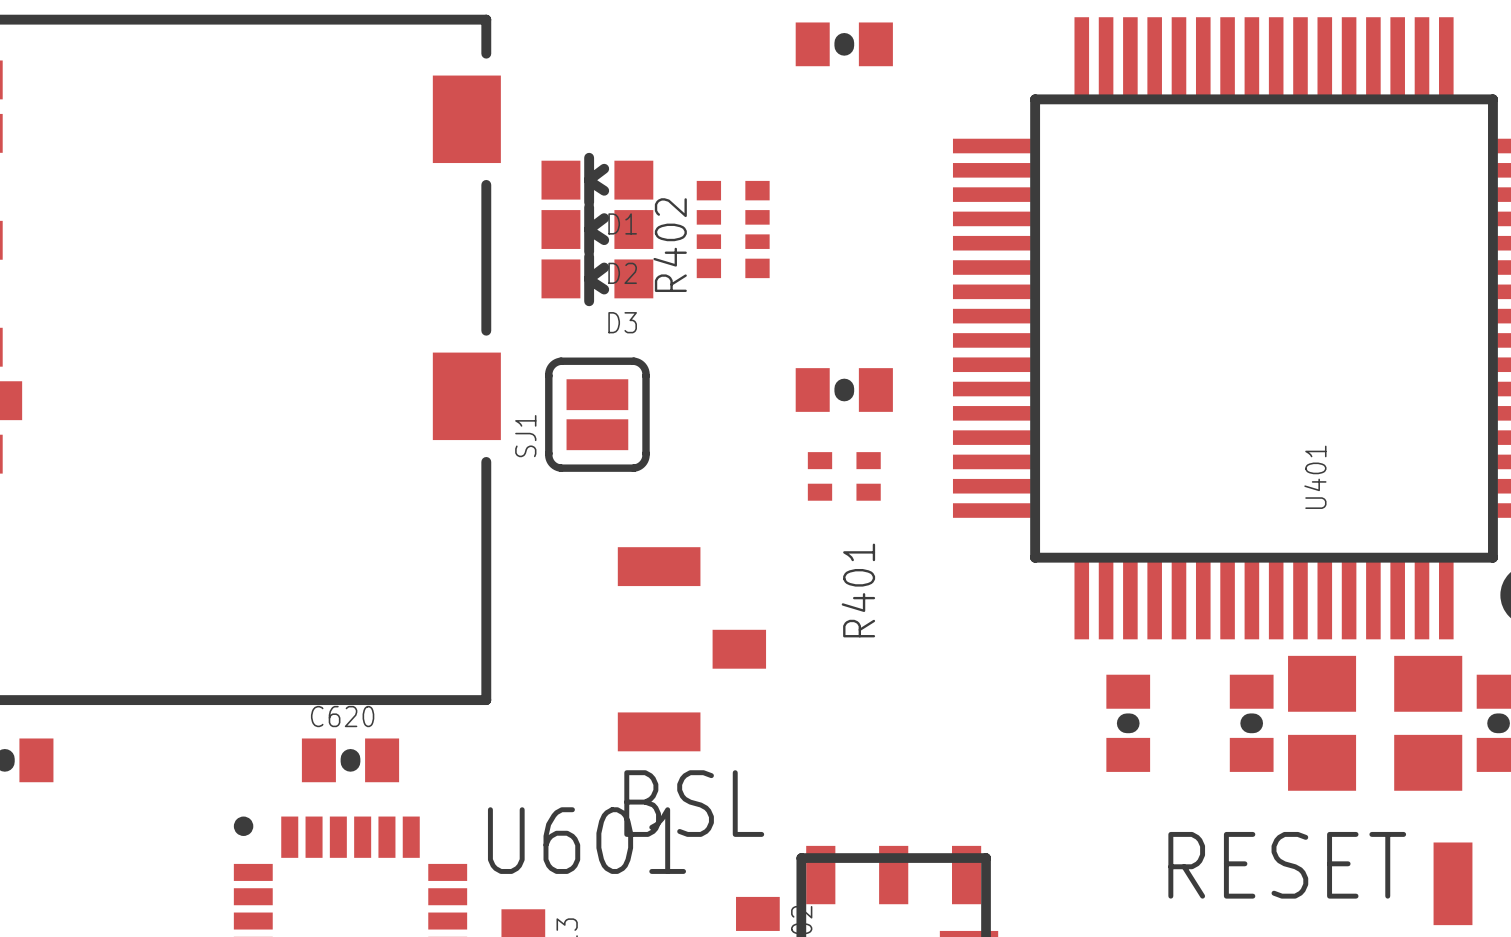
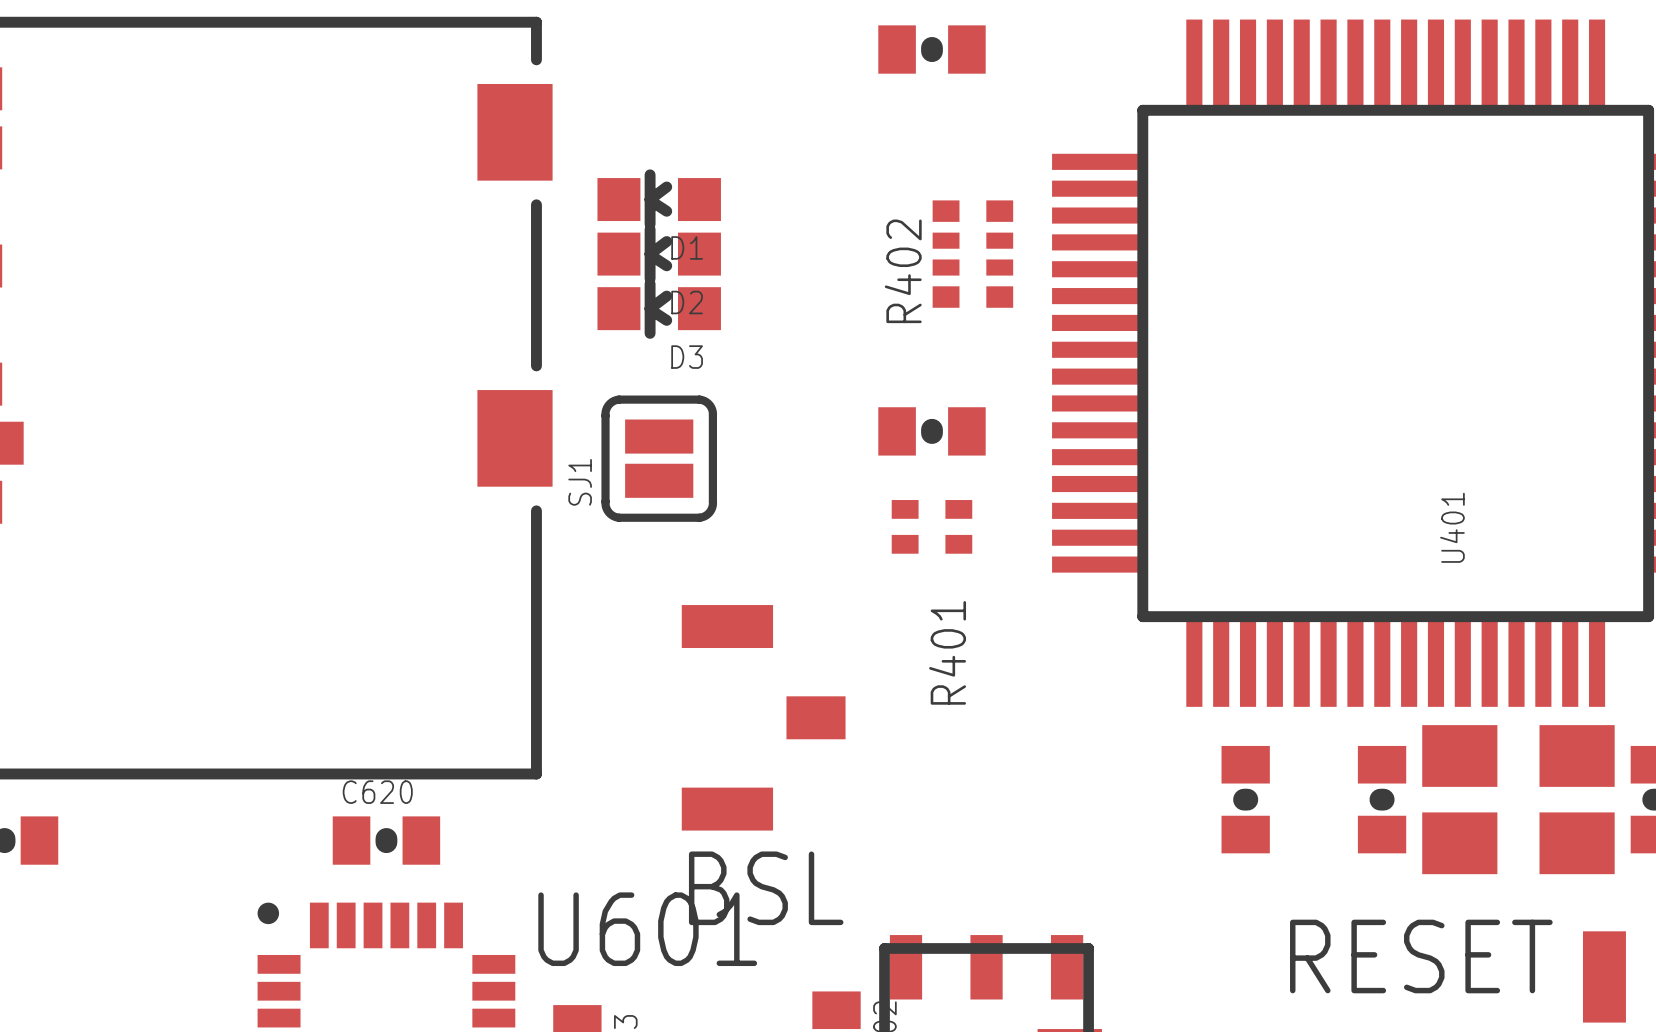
R402 position: (733, 229) -> (972, 254)

